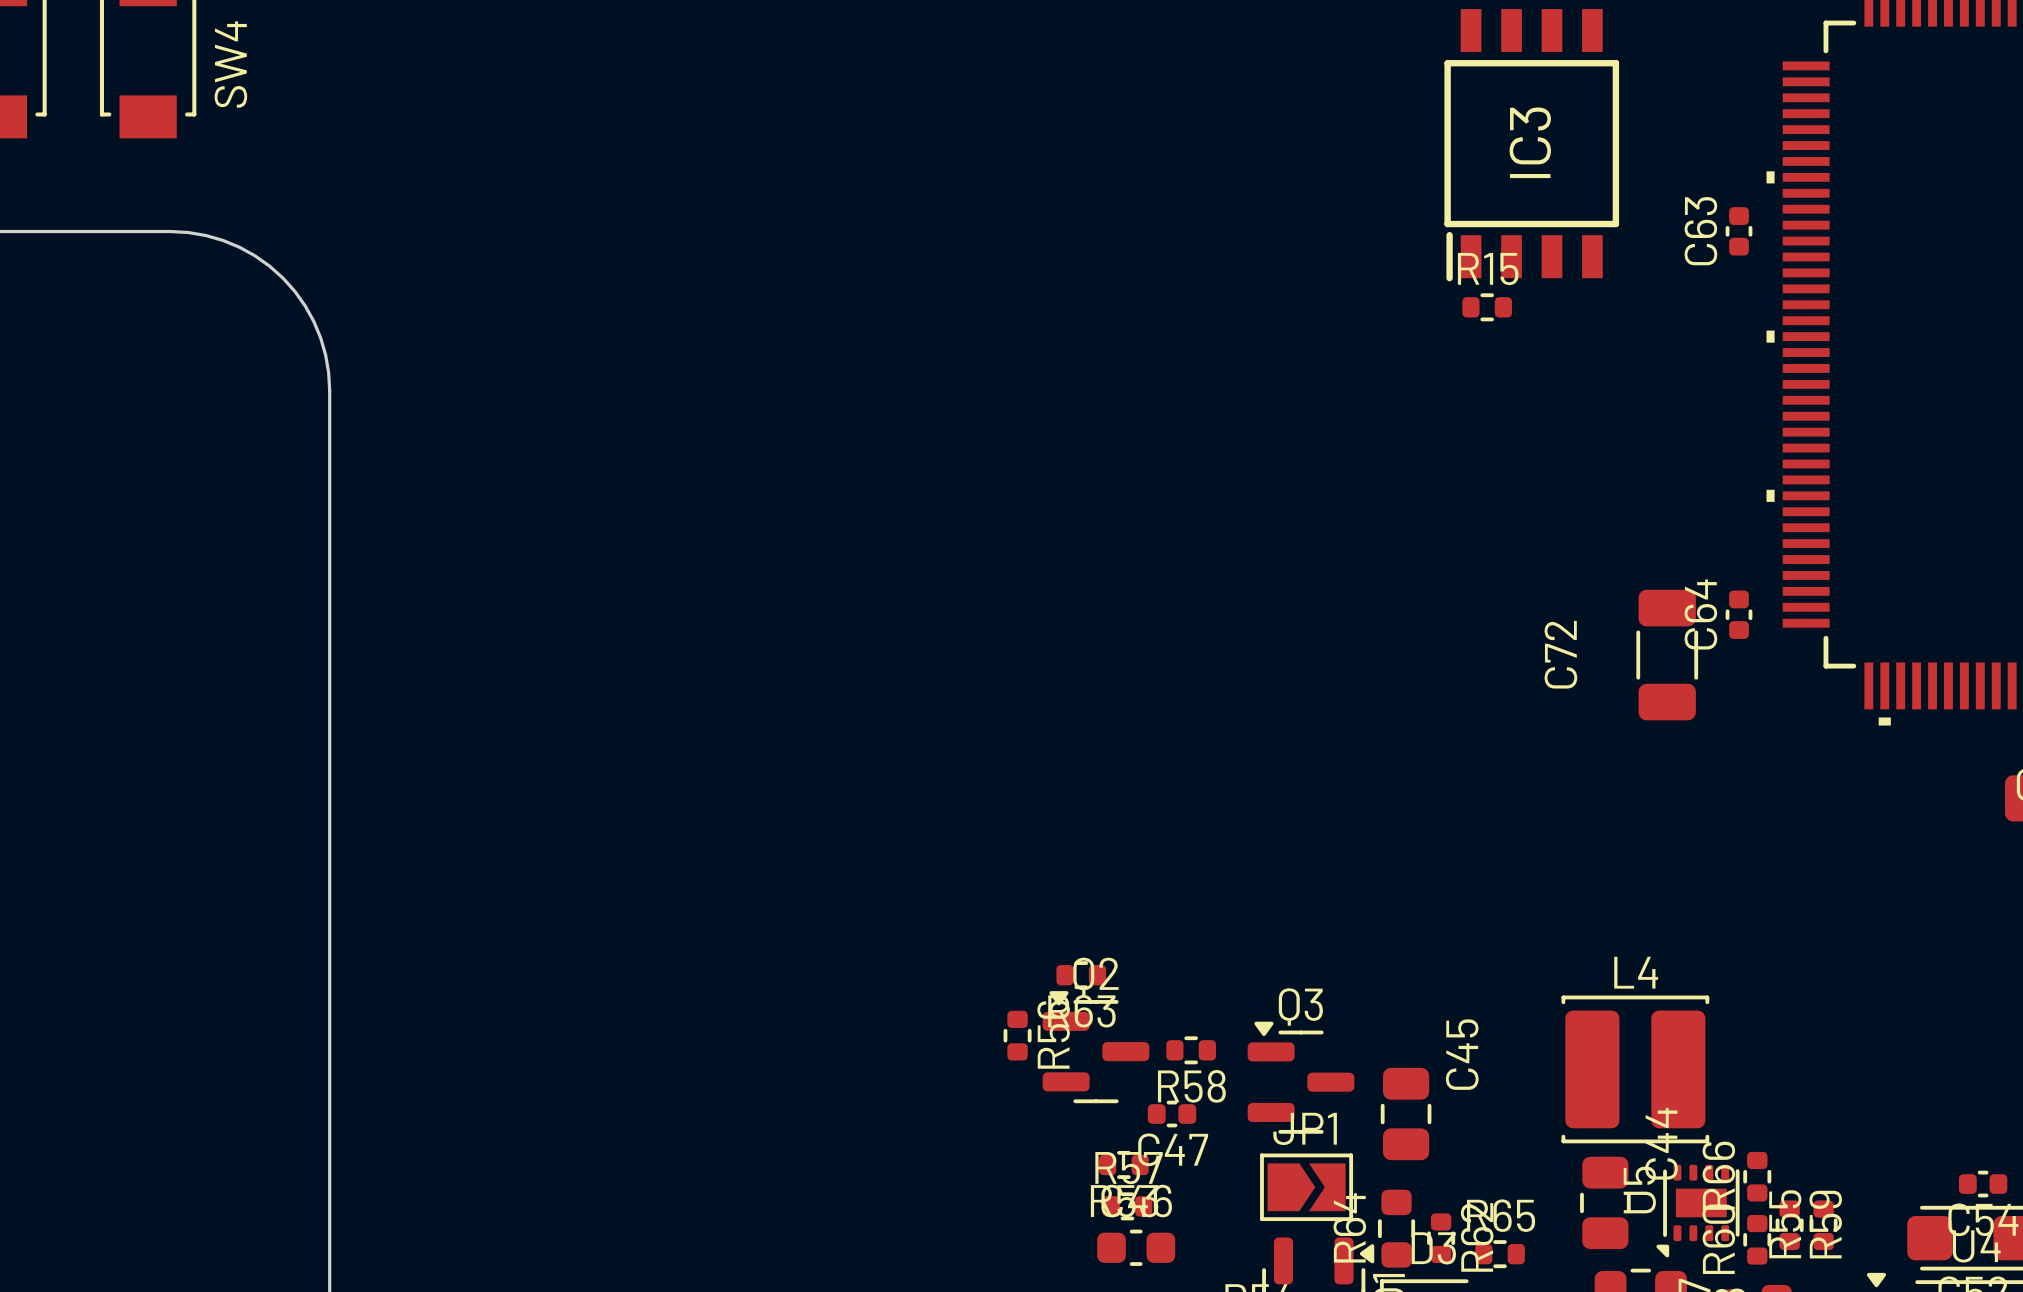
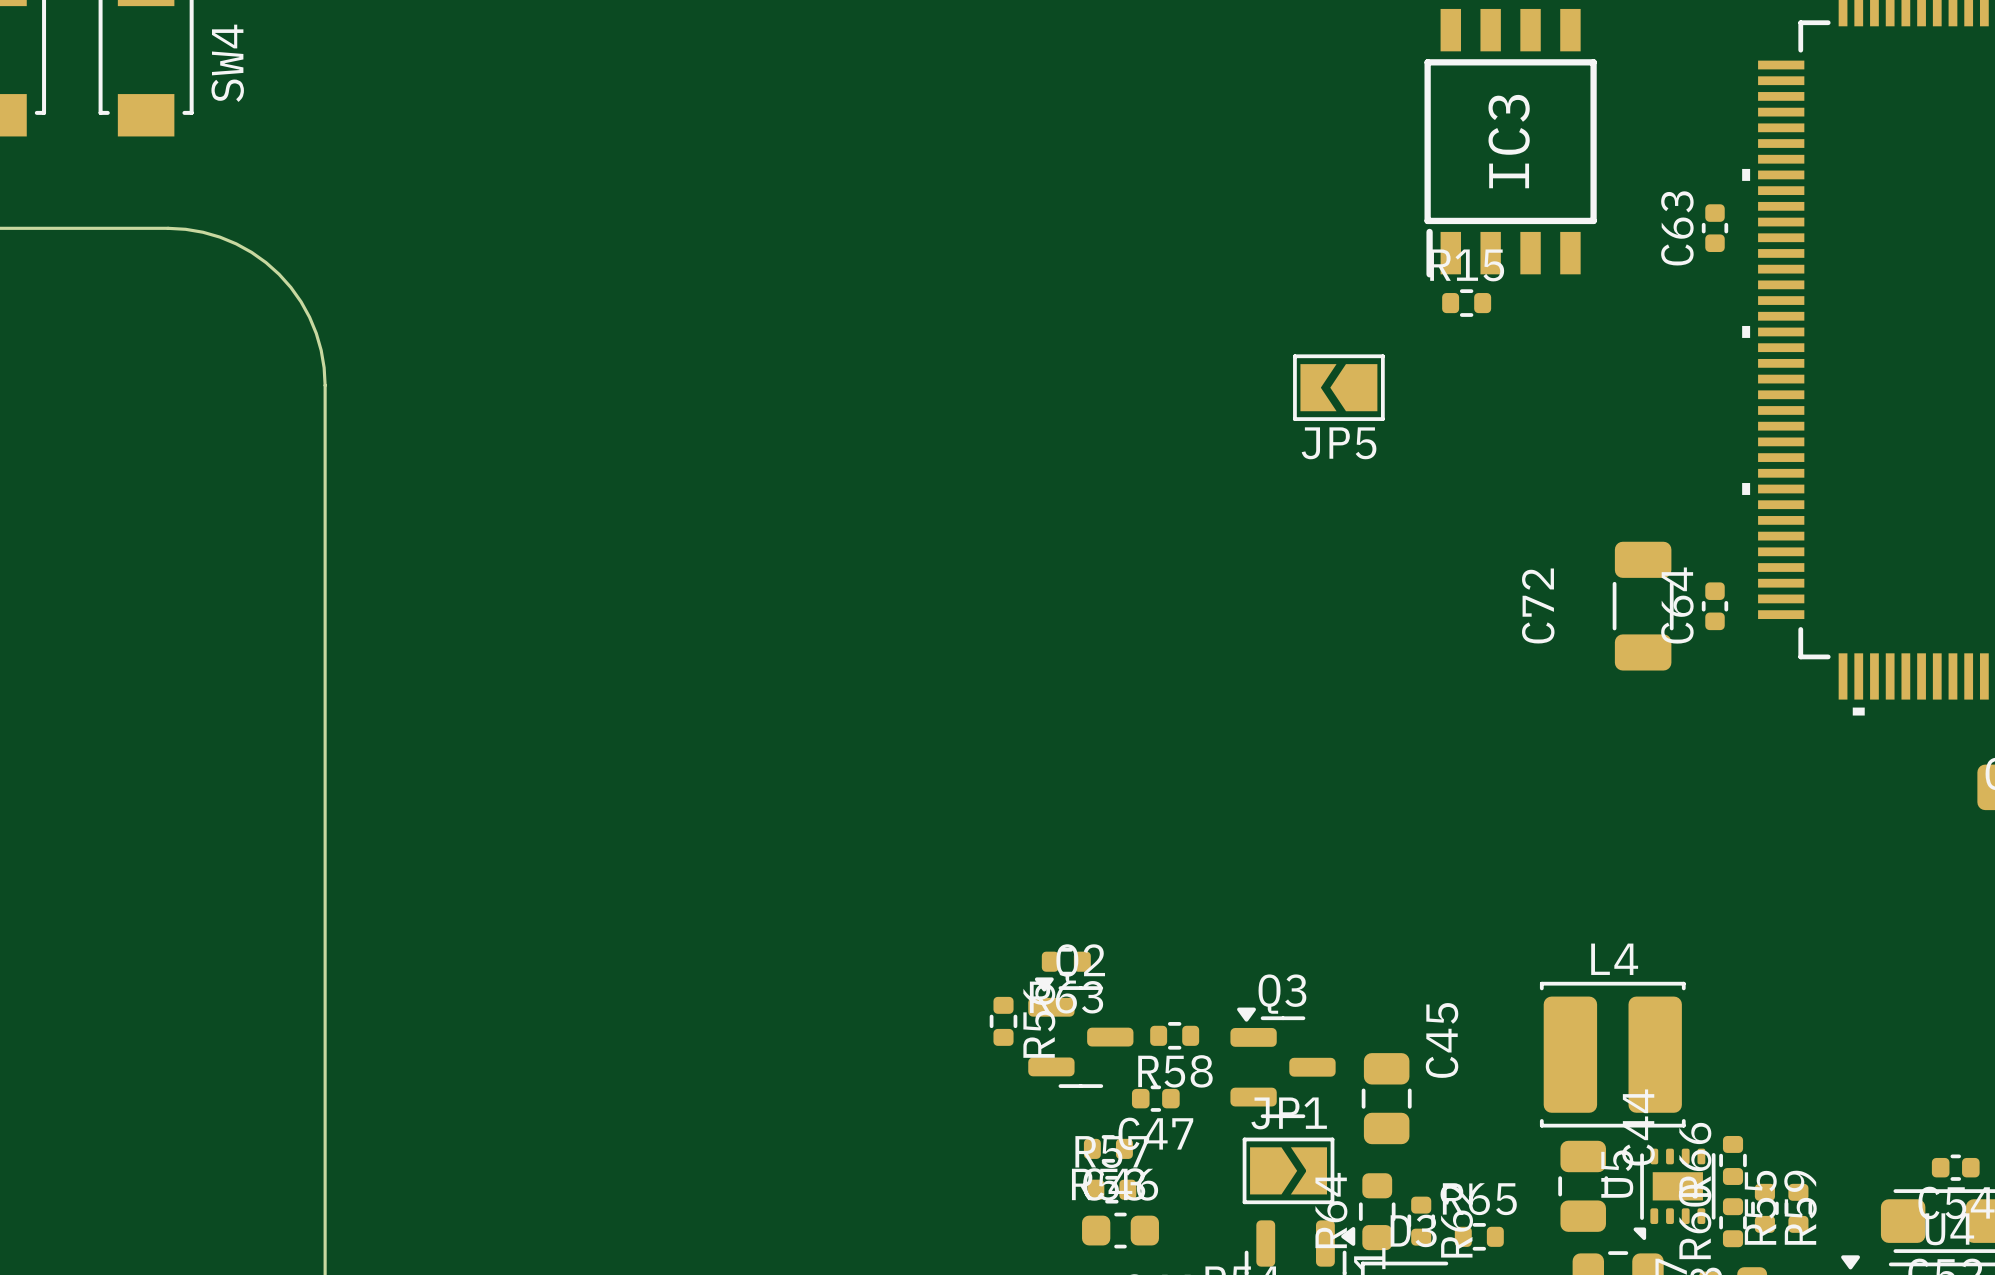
JP5: none -> (1338, 387)
C72 position: (1667, 655) -> (1643, 606)

